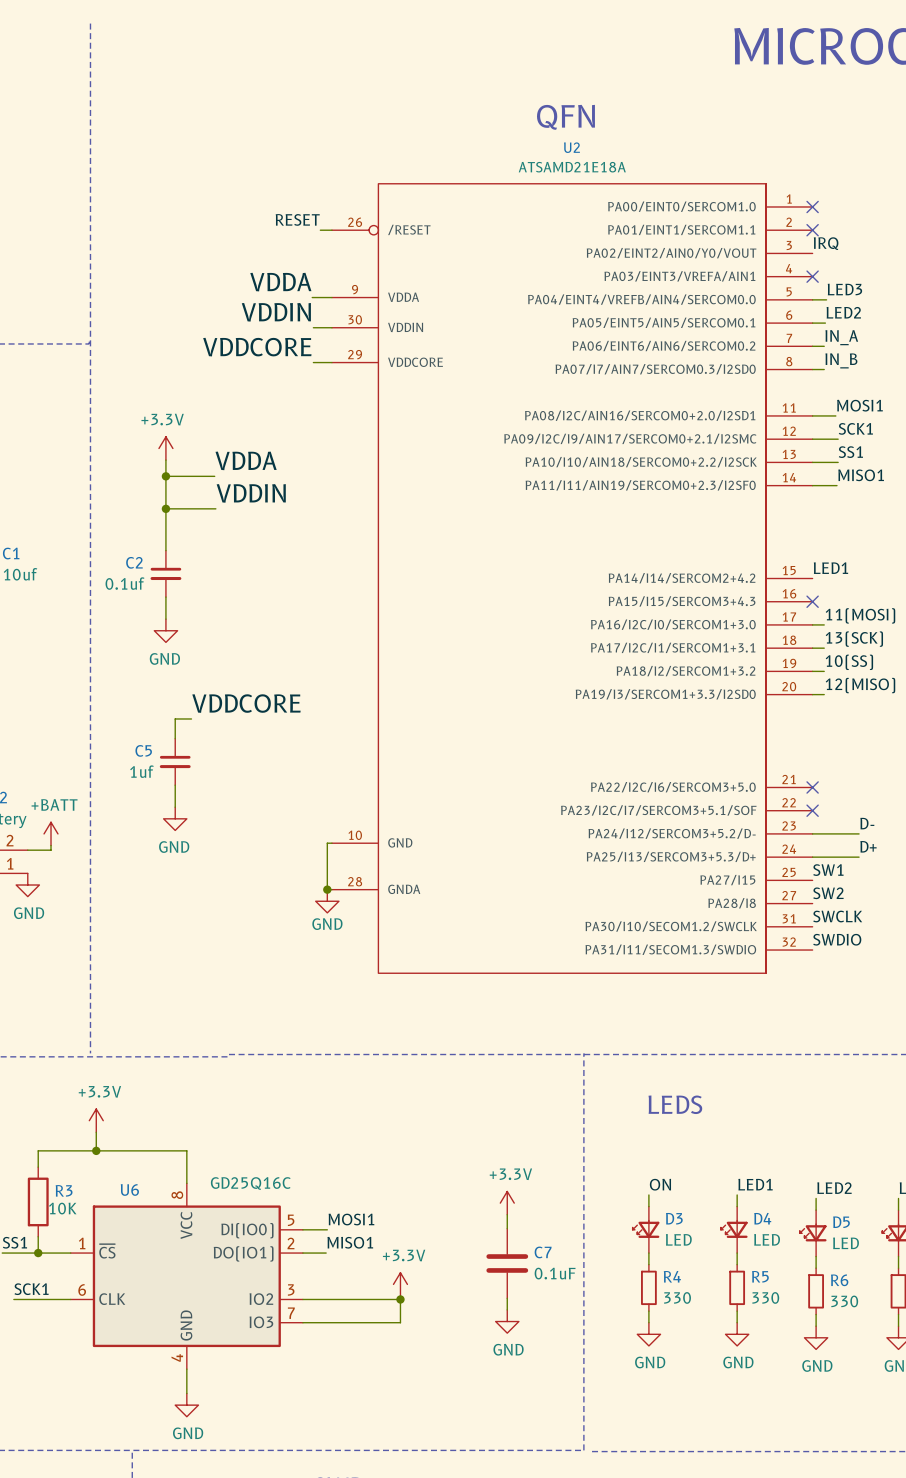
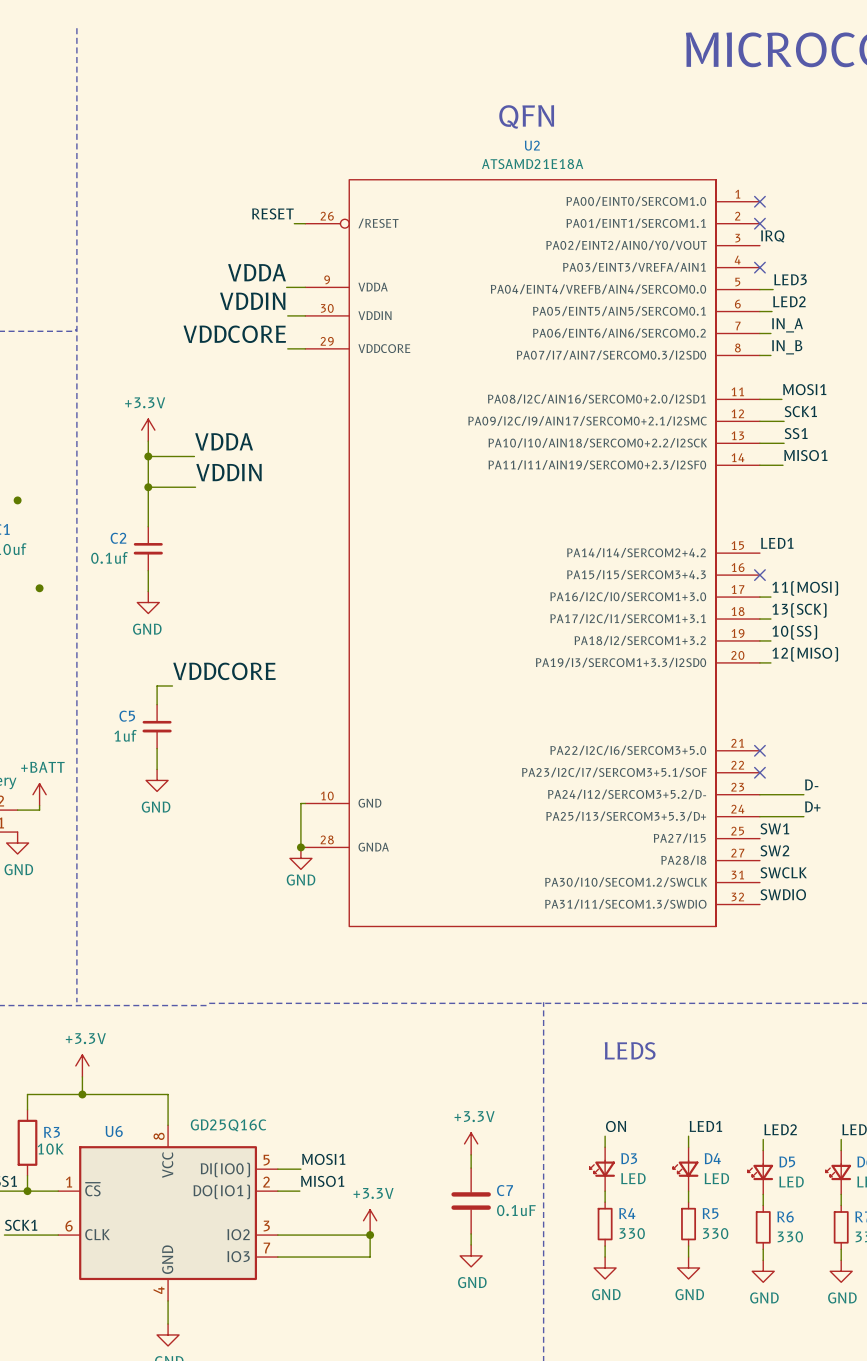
junction: none -> (17, 500)
junction: none -> (39, 588)

